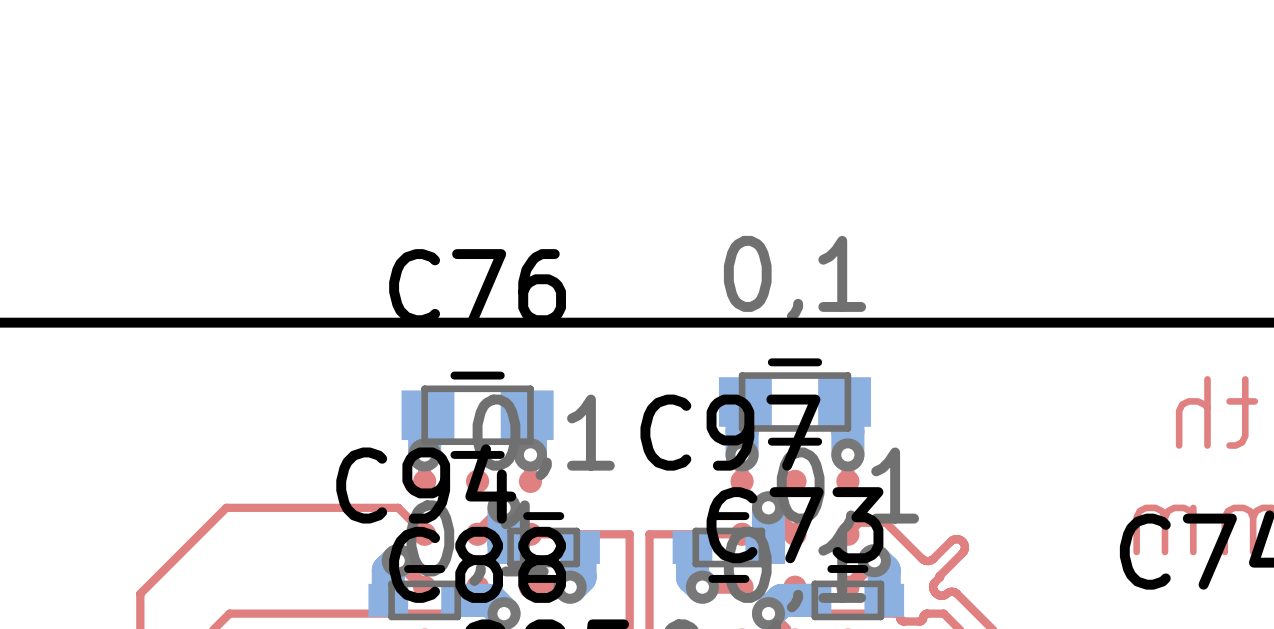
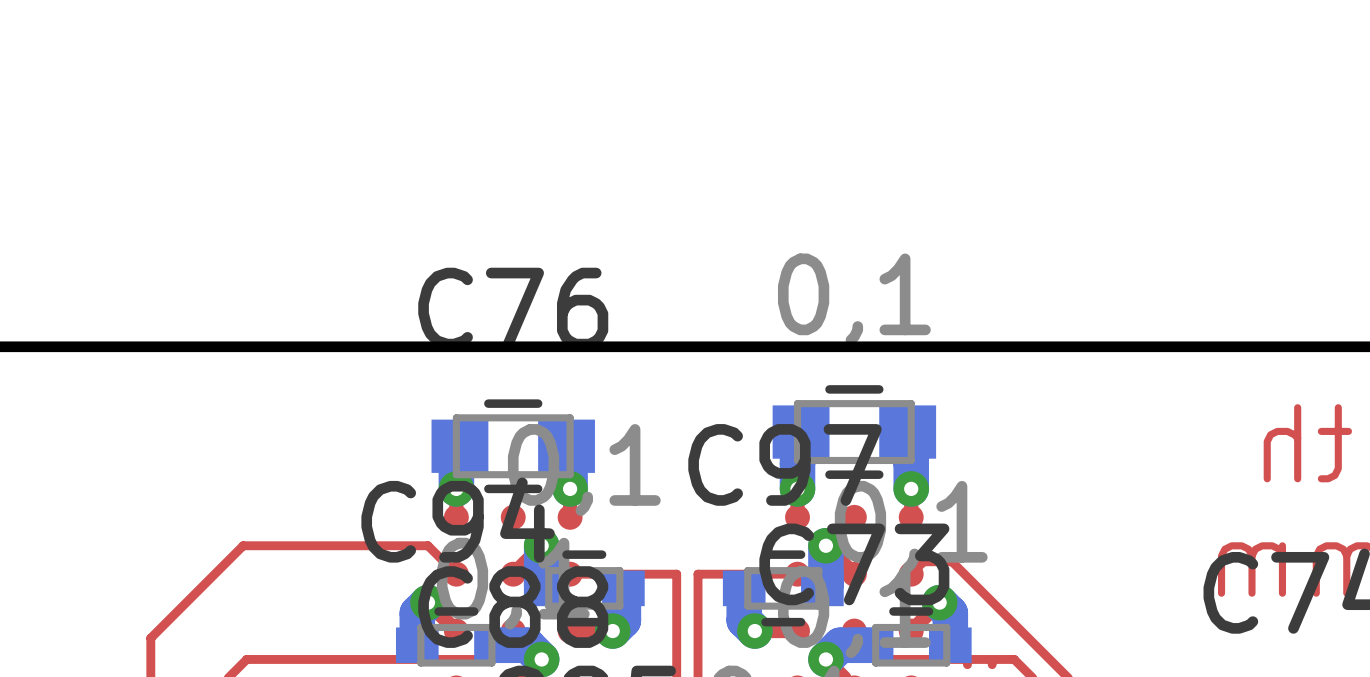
top track: (921, 558) (926, 561) (932, 559) (953, 539) (962, 541) (964, 546) (963, 551) (939, 576) -> (990, 600) (1028, 638)
top track: (940, 577) (933, 586) (936, 593) (942, 595) (951, 591) (957, 593) -> none
top track: none -> (996, 659) (963, 659)
top track: (919, 621) (904, 621) -> none

